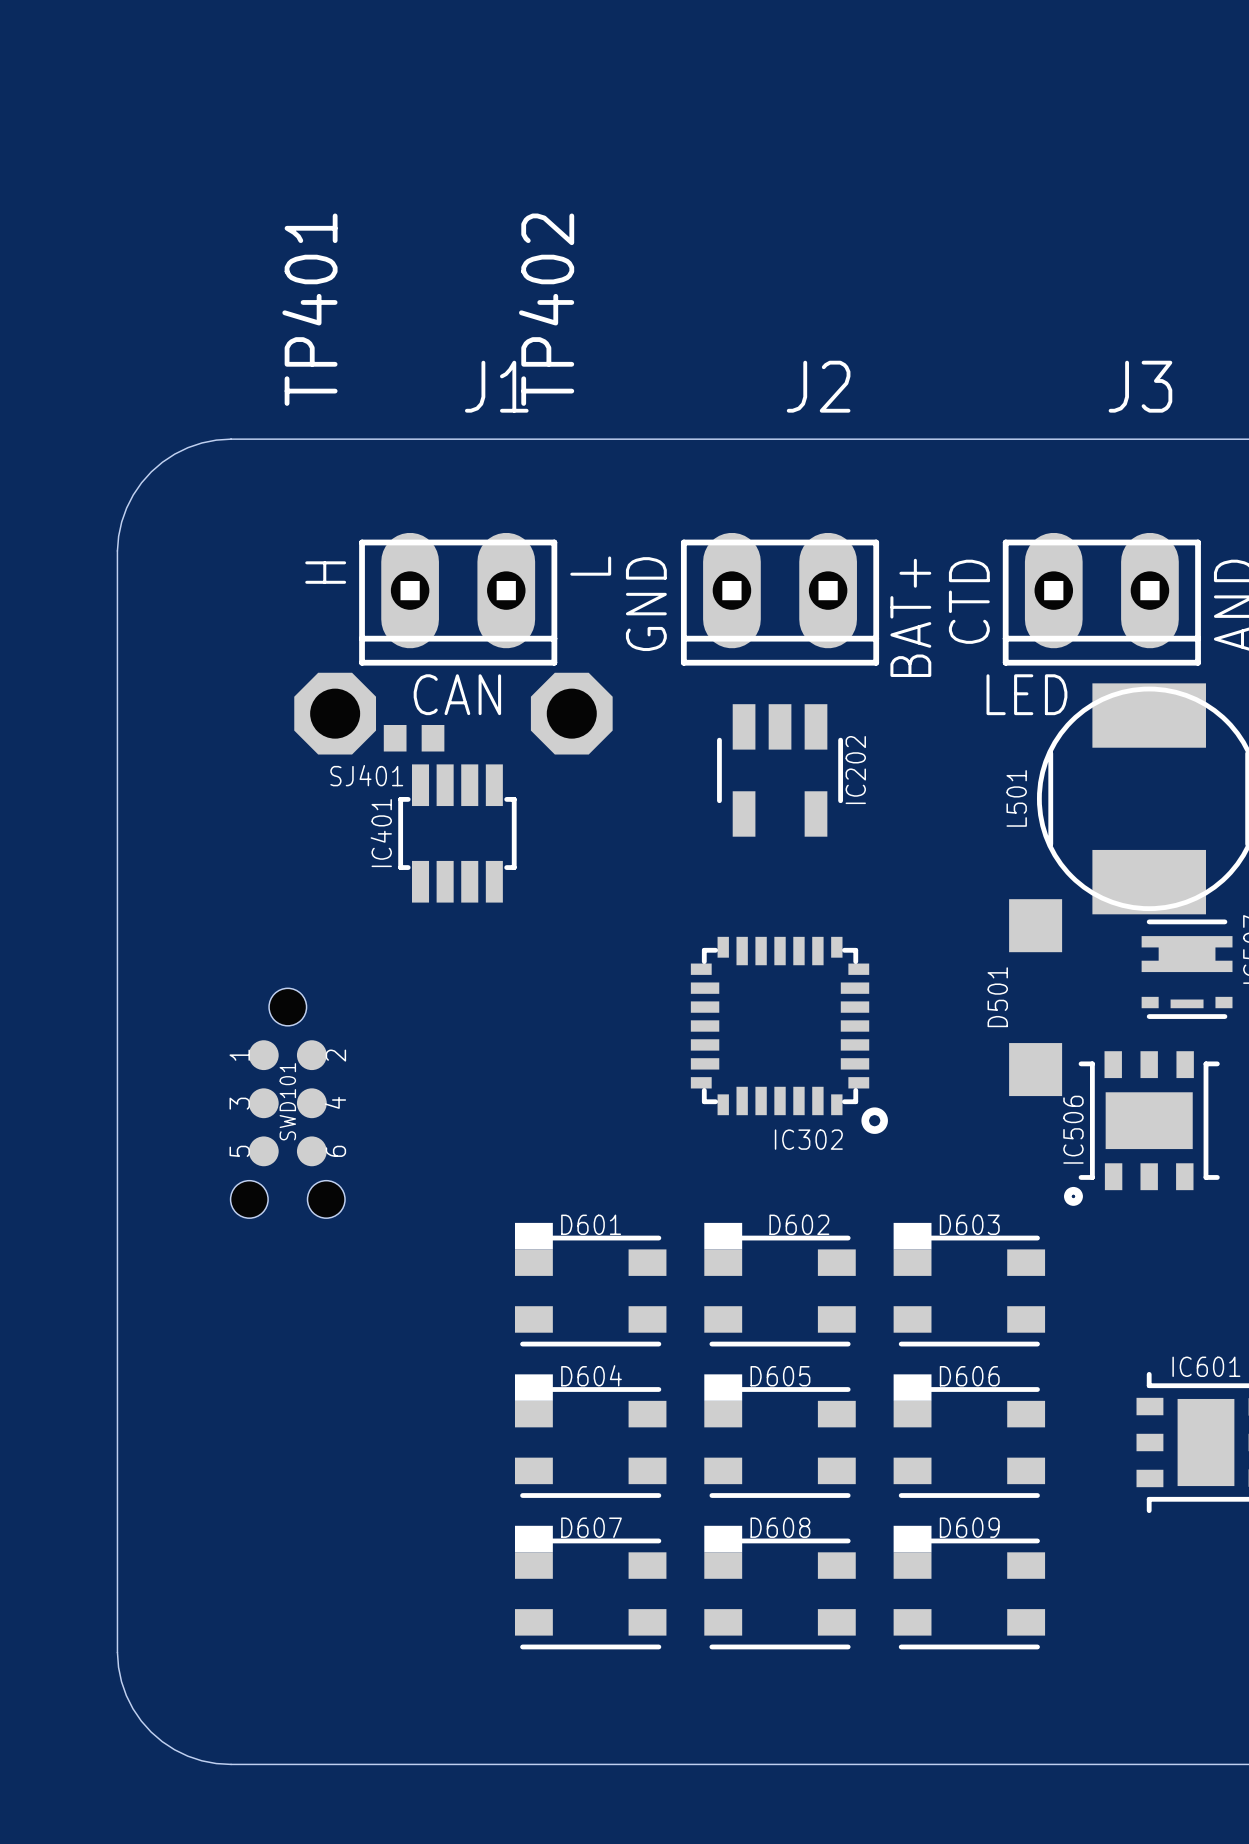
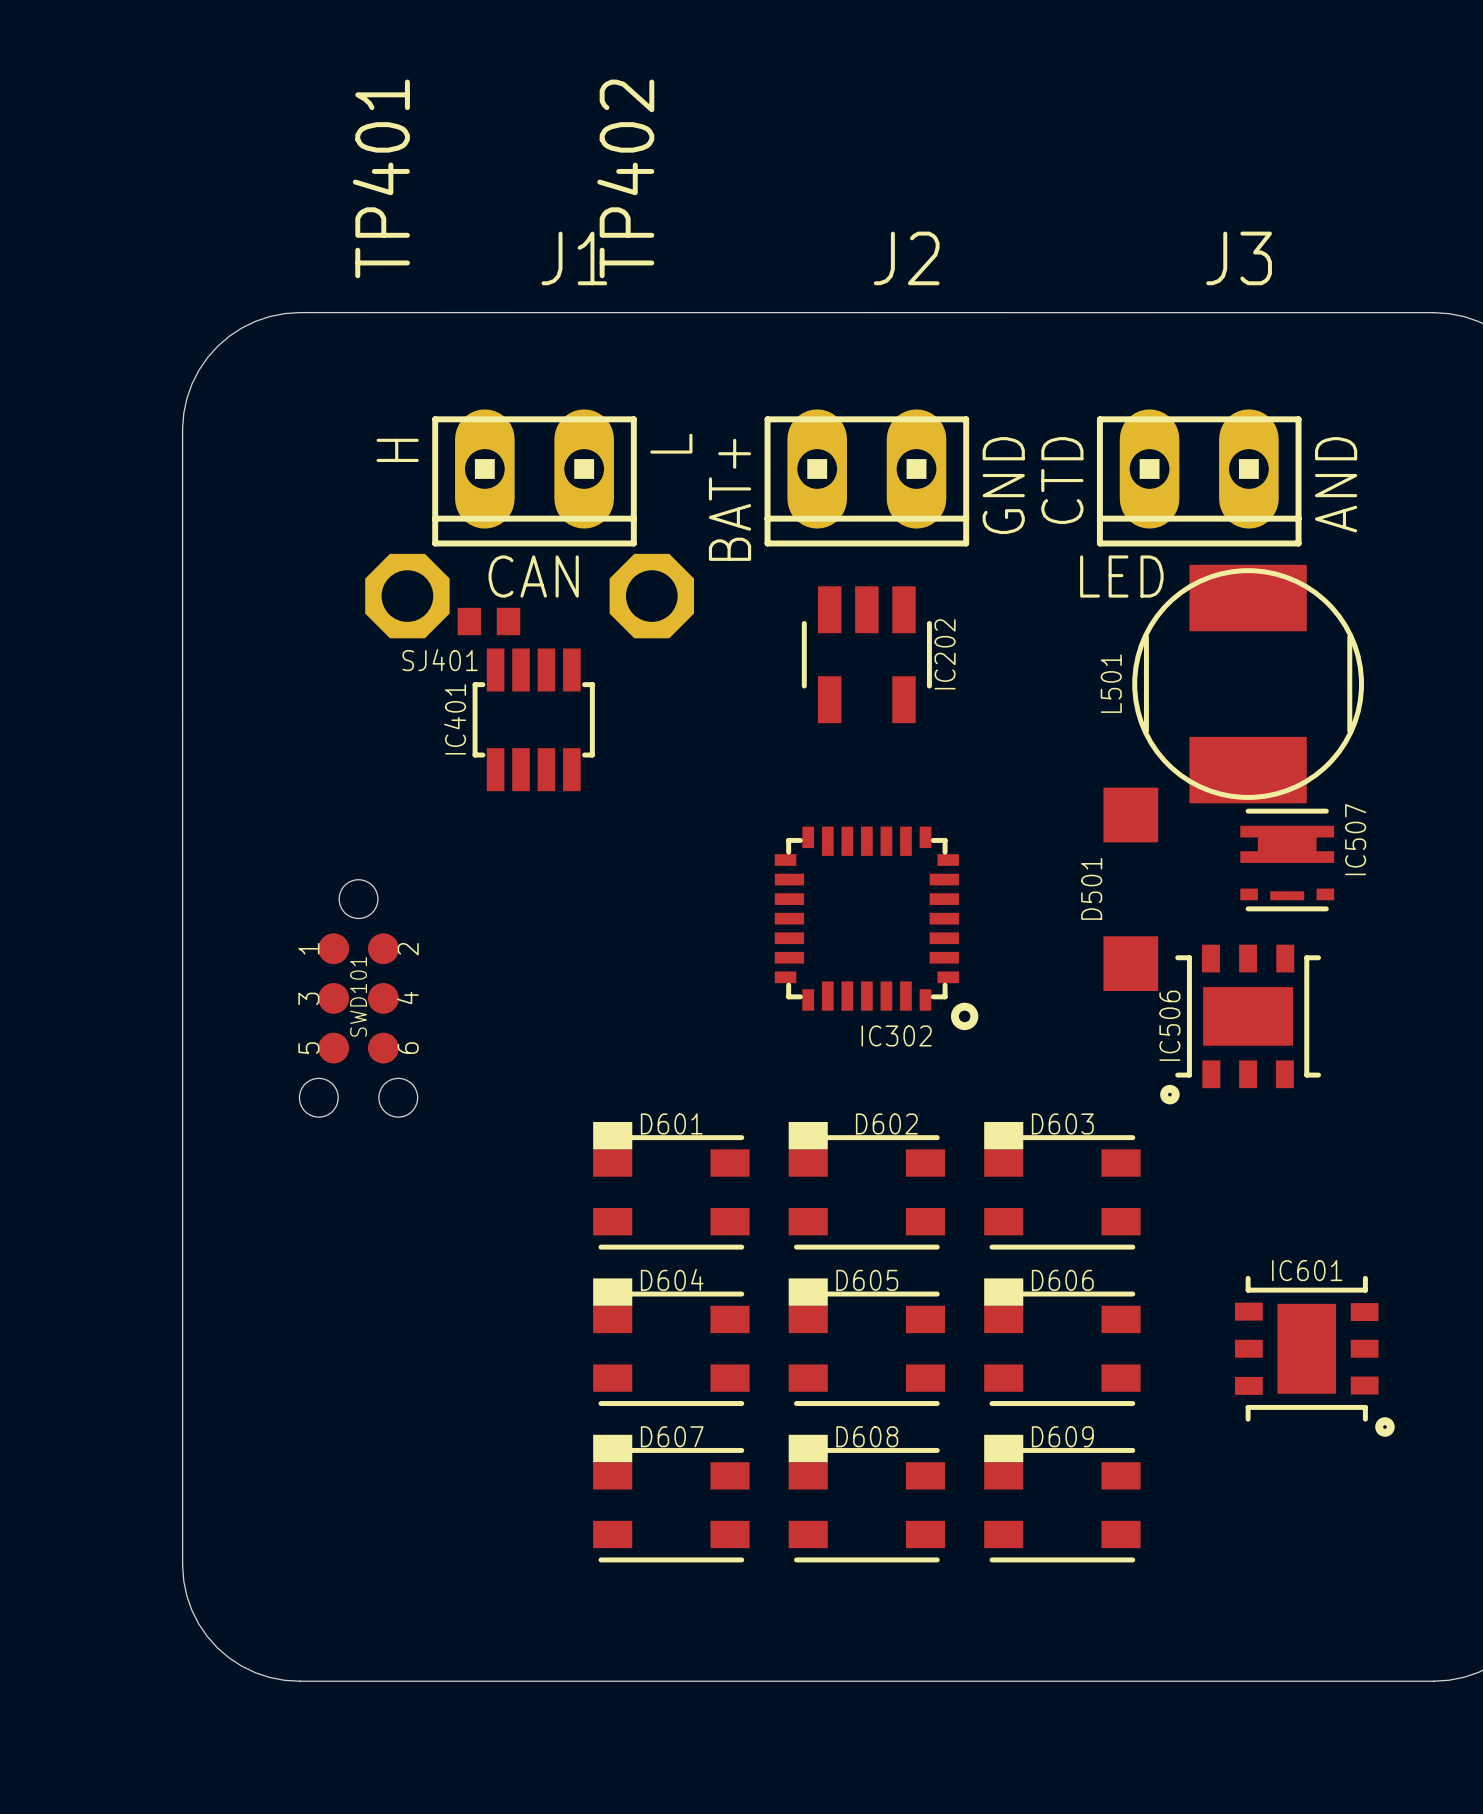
text: GND (646, 604) -> BAT+ (730, 499)
text: BAT+ (910, 617) -> GND (1003, 485)

